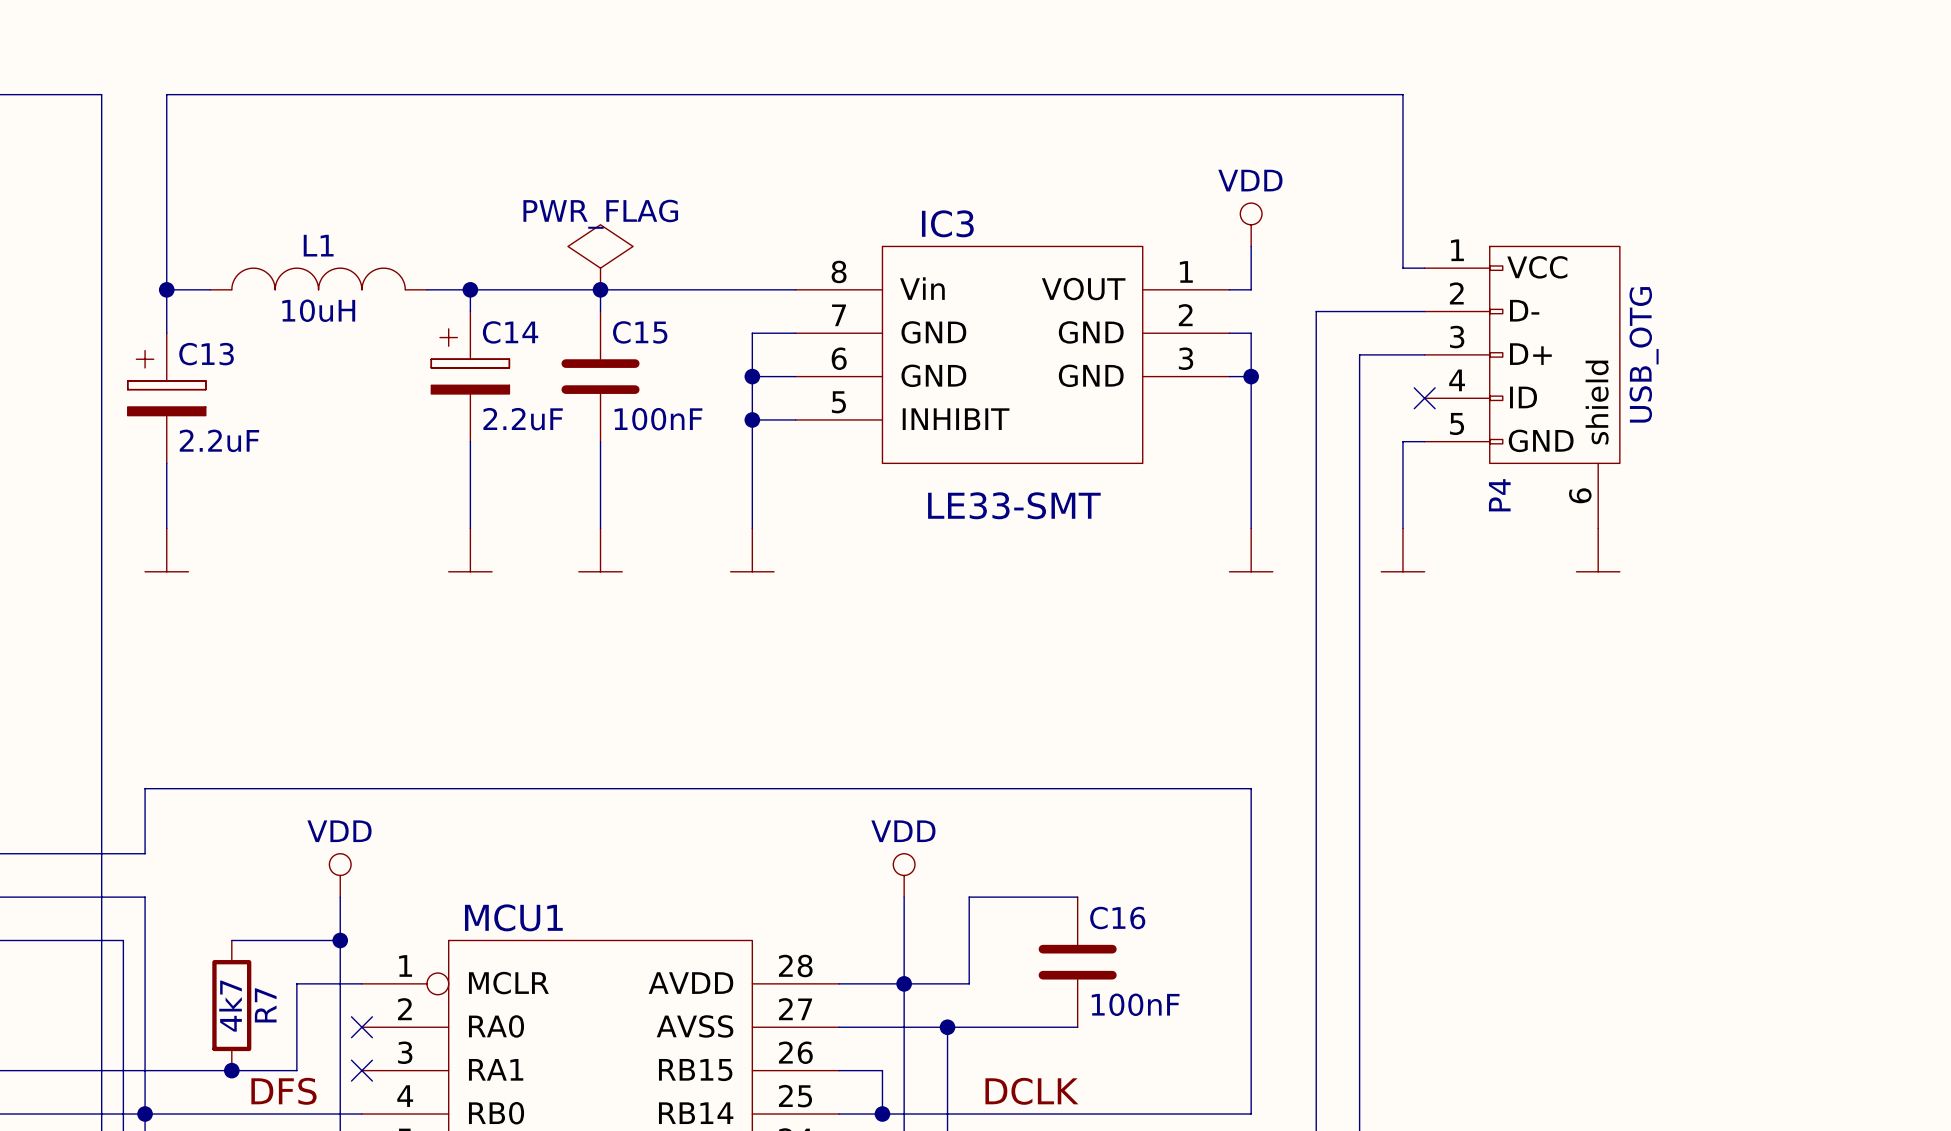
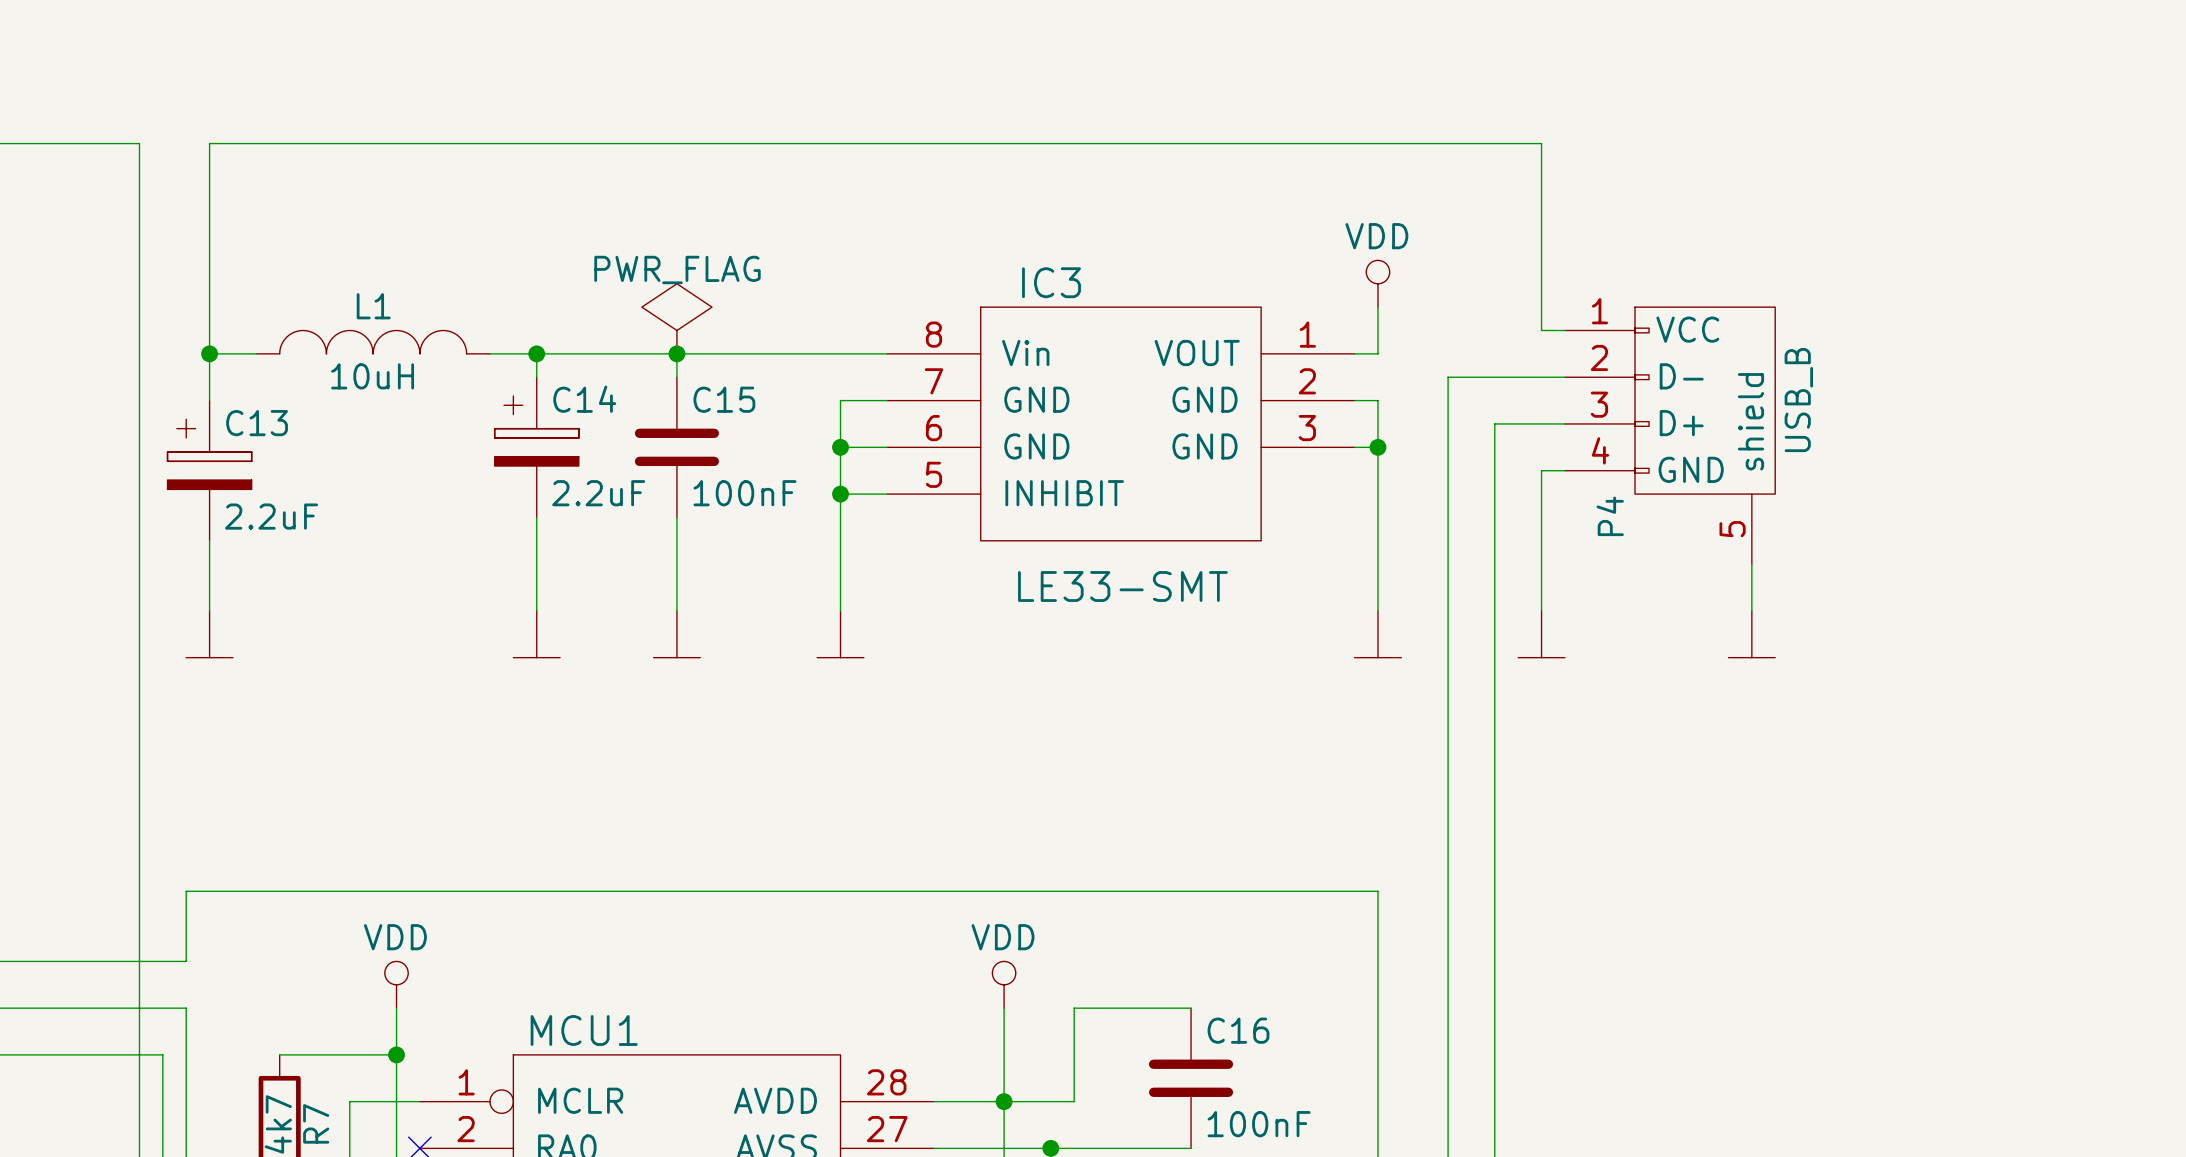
P4 symbol: [1424, 246, 1620, 529] -> [1564, 307, 1776, 565]
P4 value: USB_OTG (1644, 354) -> USB_B (1798, 400)
no-connect mark: (1424, 398) -> none
wire: (1402, 441) (1424, 441) -> (1541, 517) (1541, 470) (1564, 470)
P4 name position: P4 (1499, 495) -> P4 (1610, 516)

